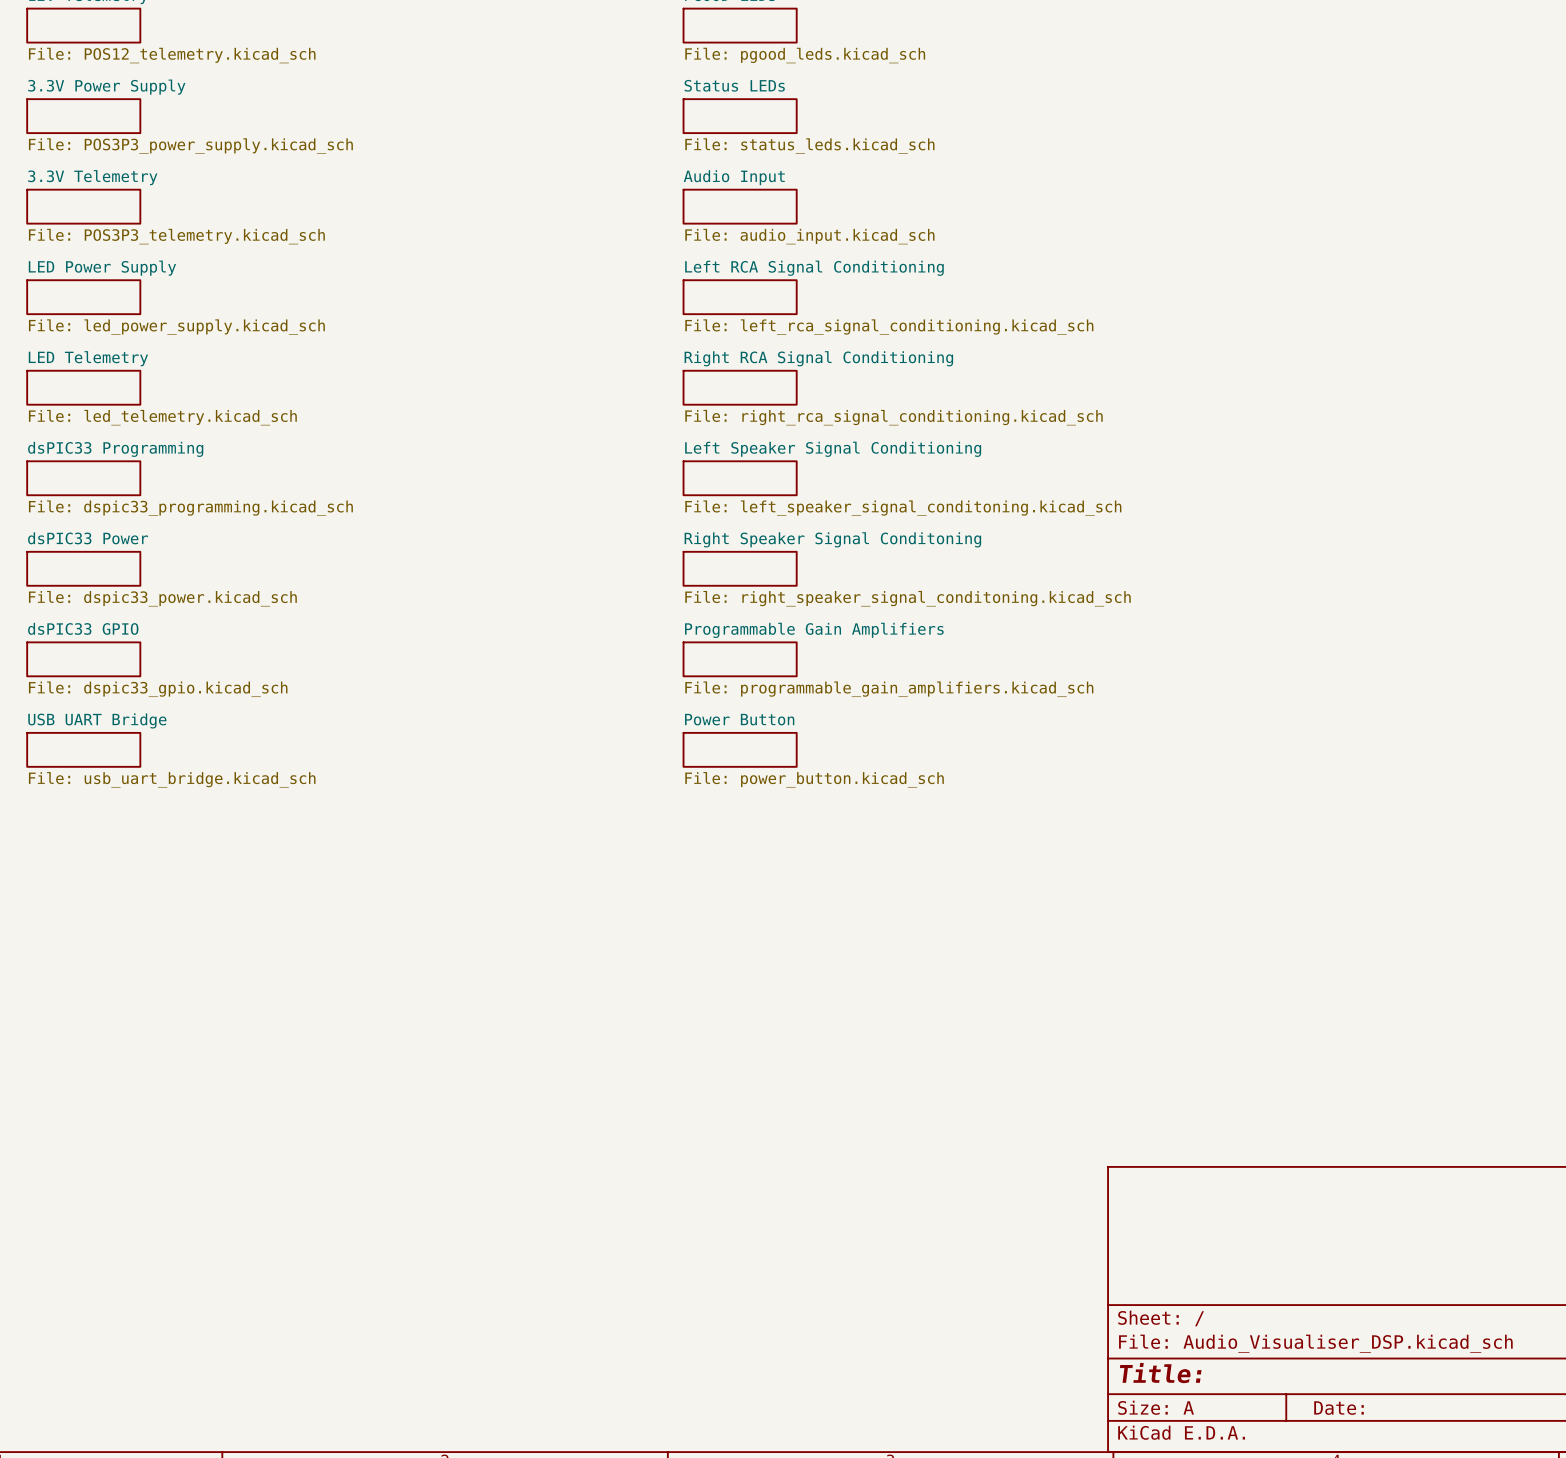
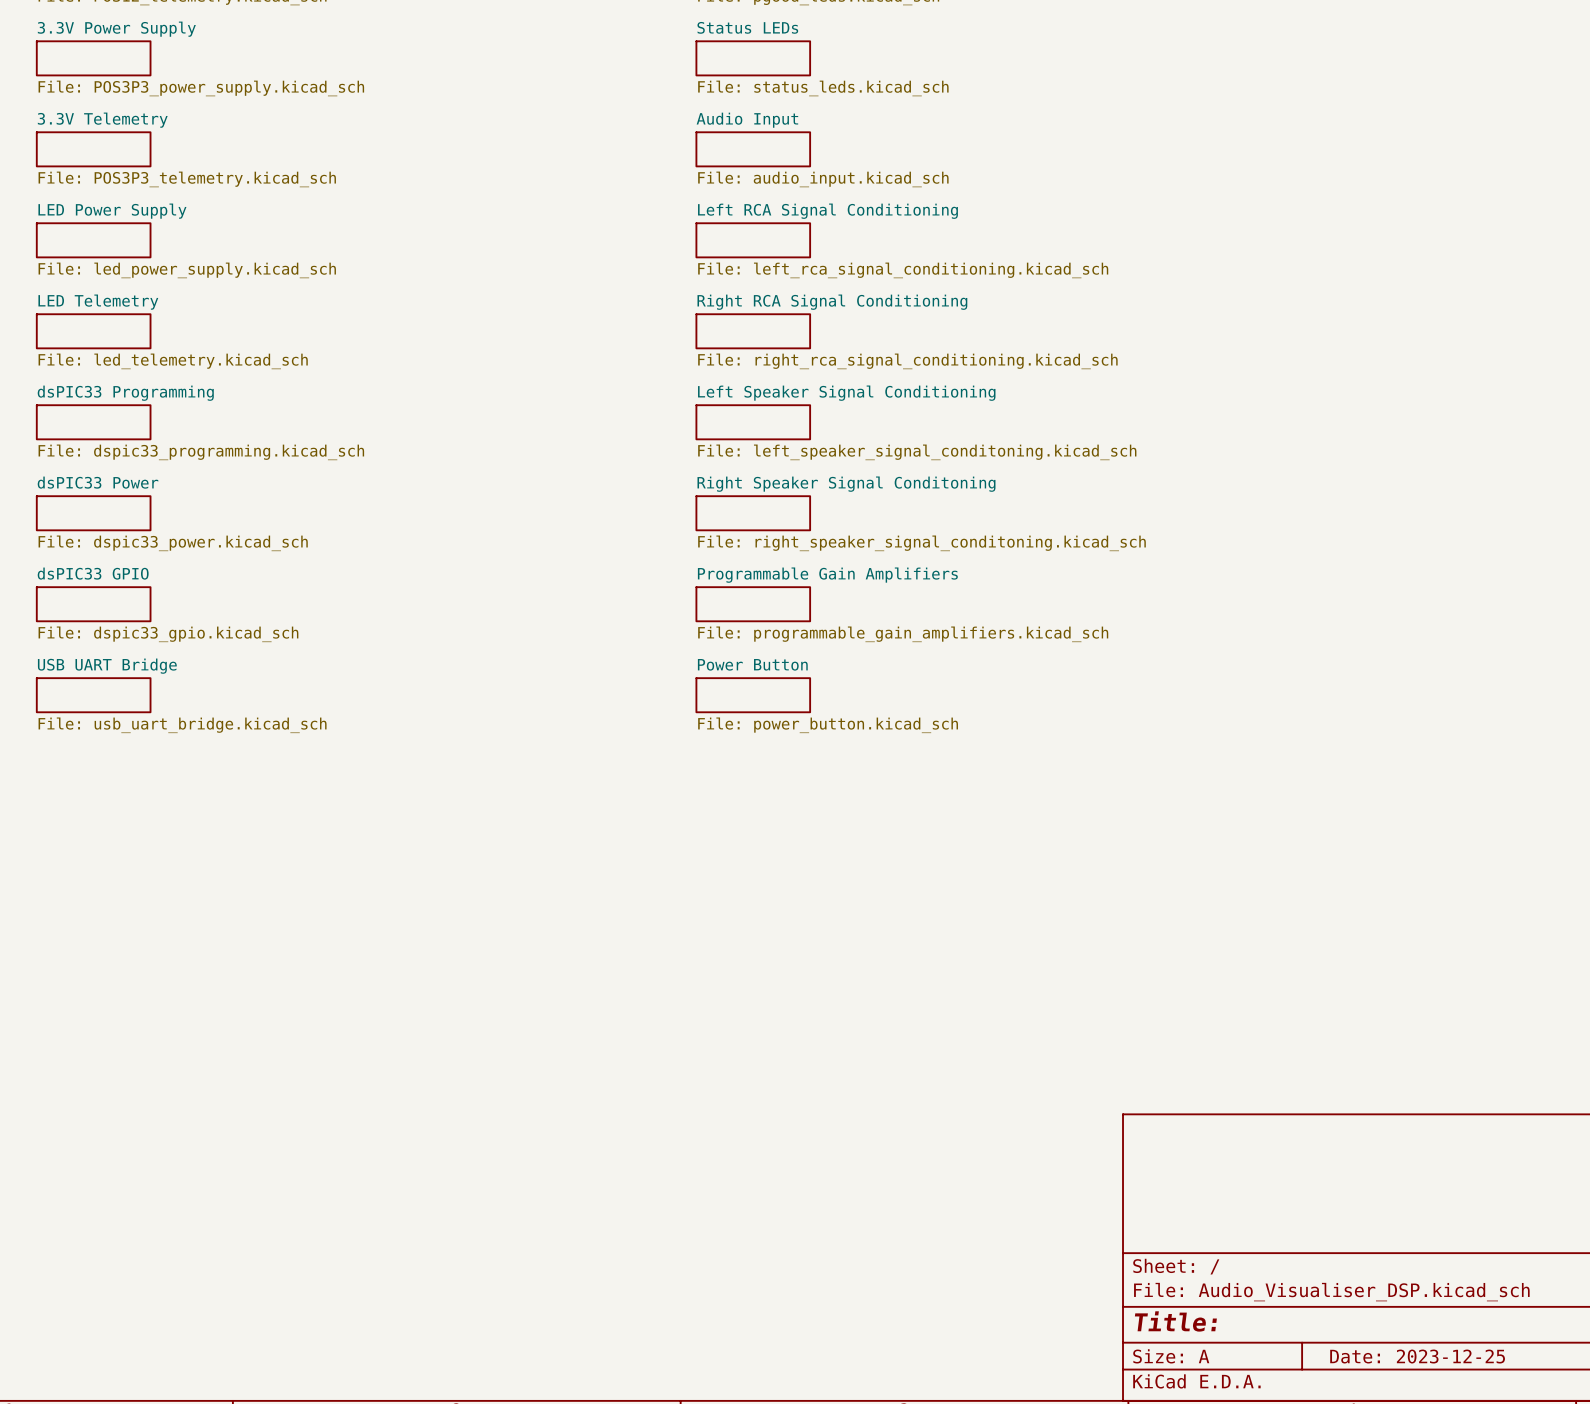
title block: Date: (1339, 1408) -> Date: 2023-12-25 (1417, 1356)

